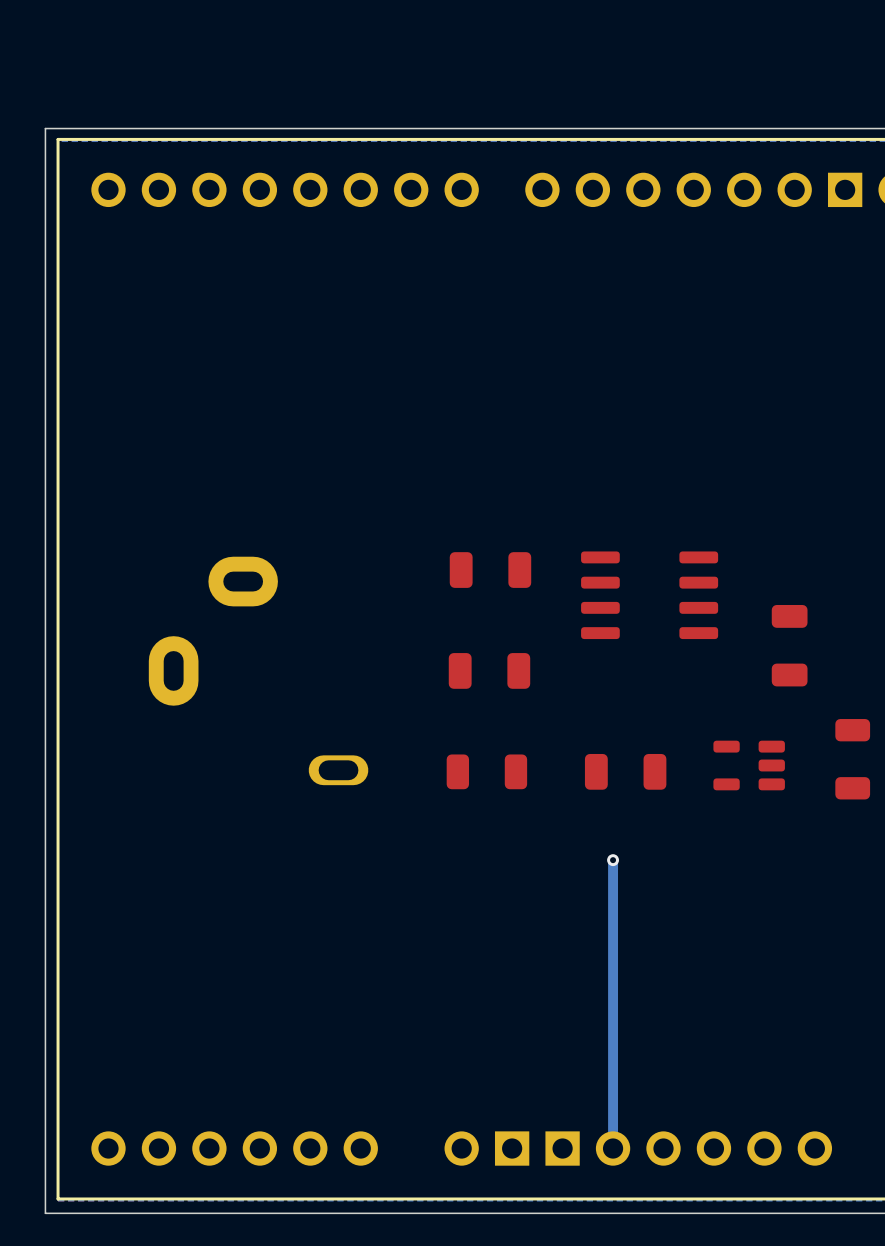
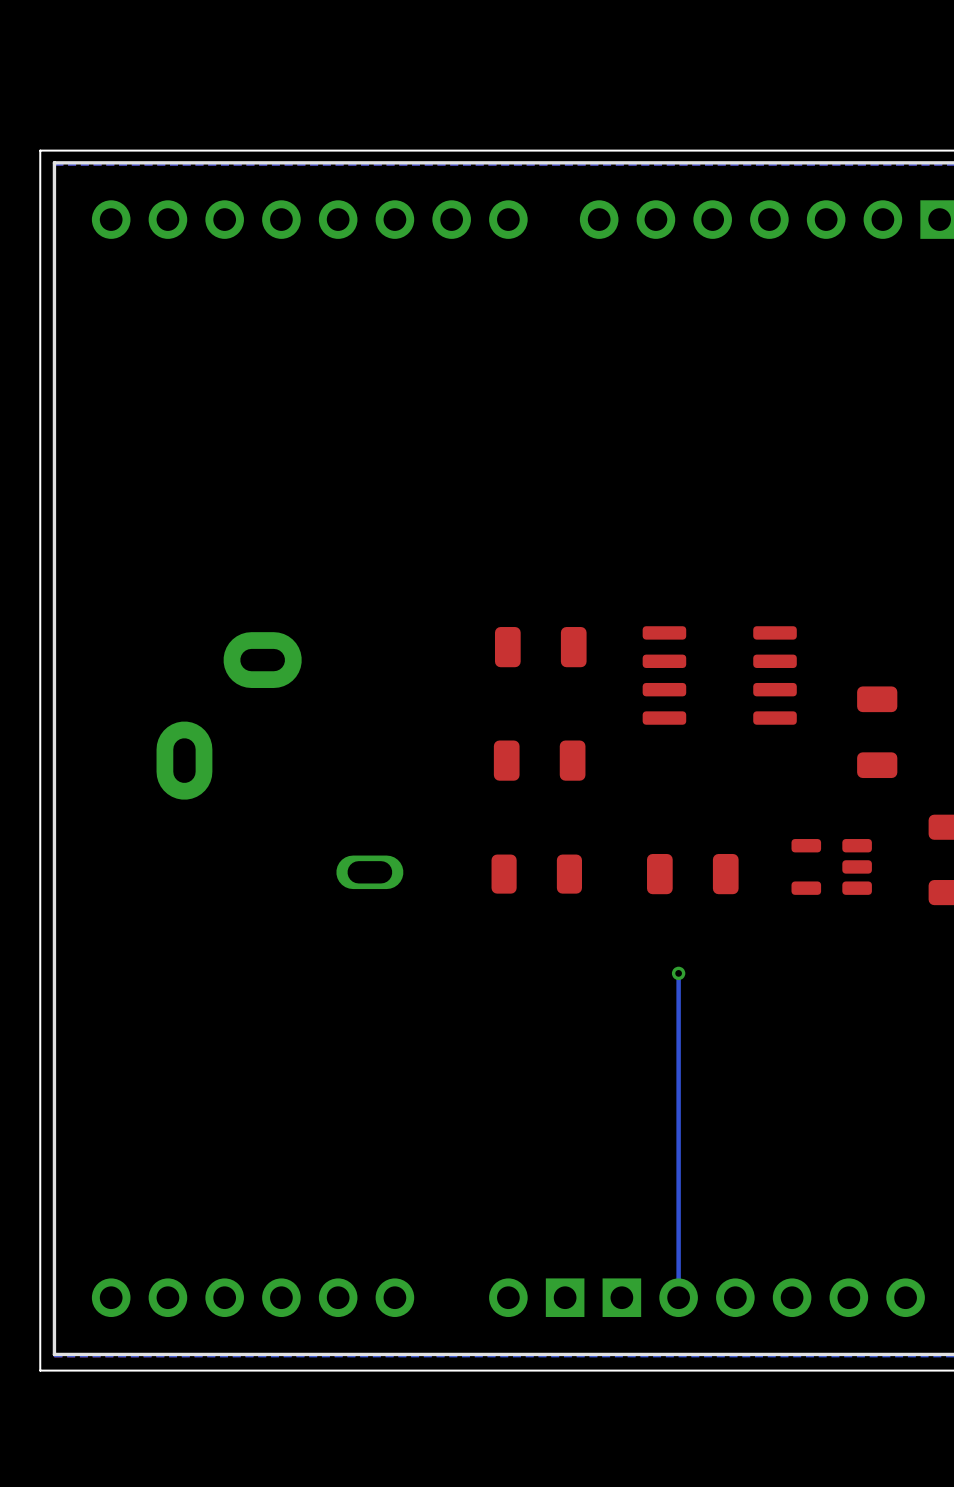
bottom track width: thick (613, 860) (613, 1148) -> thin (678, 973) (678, 1297)

